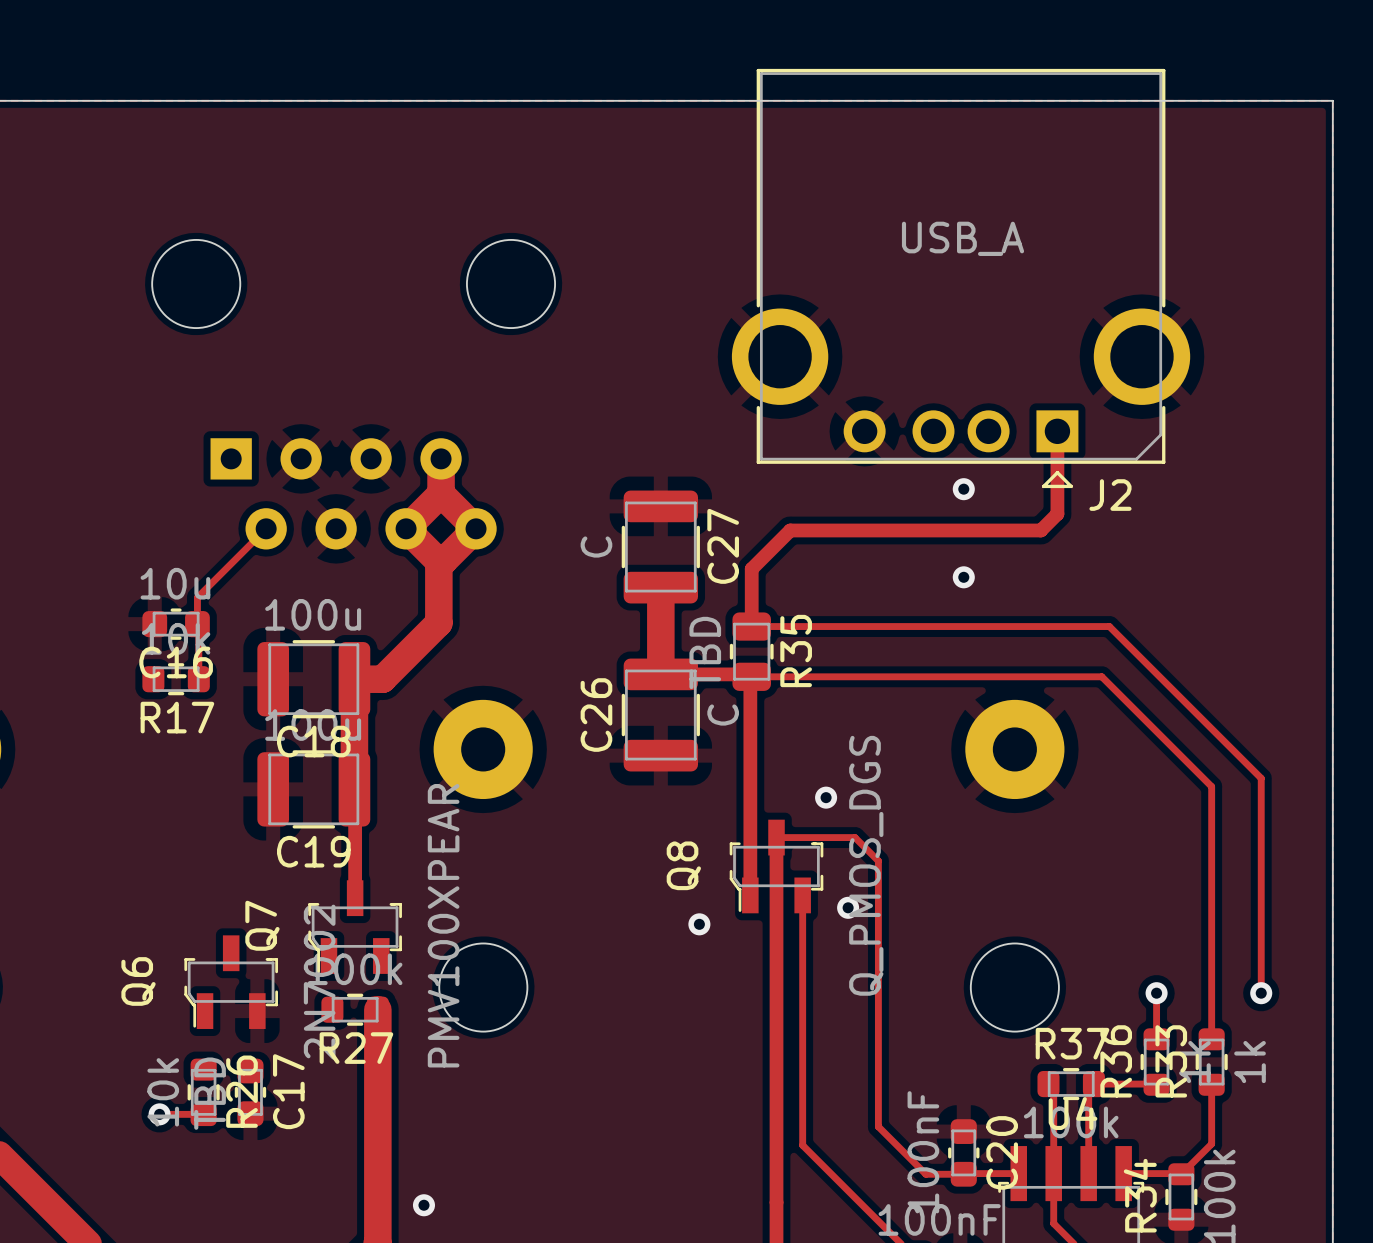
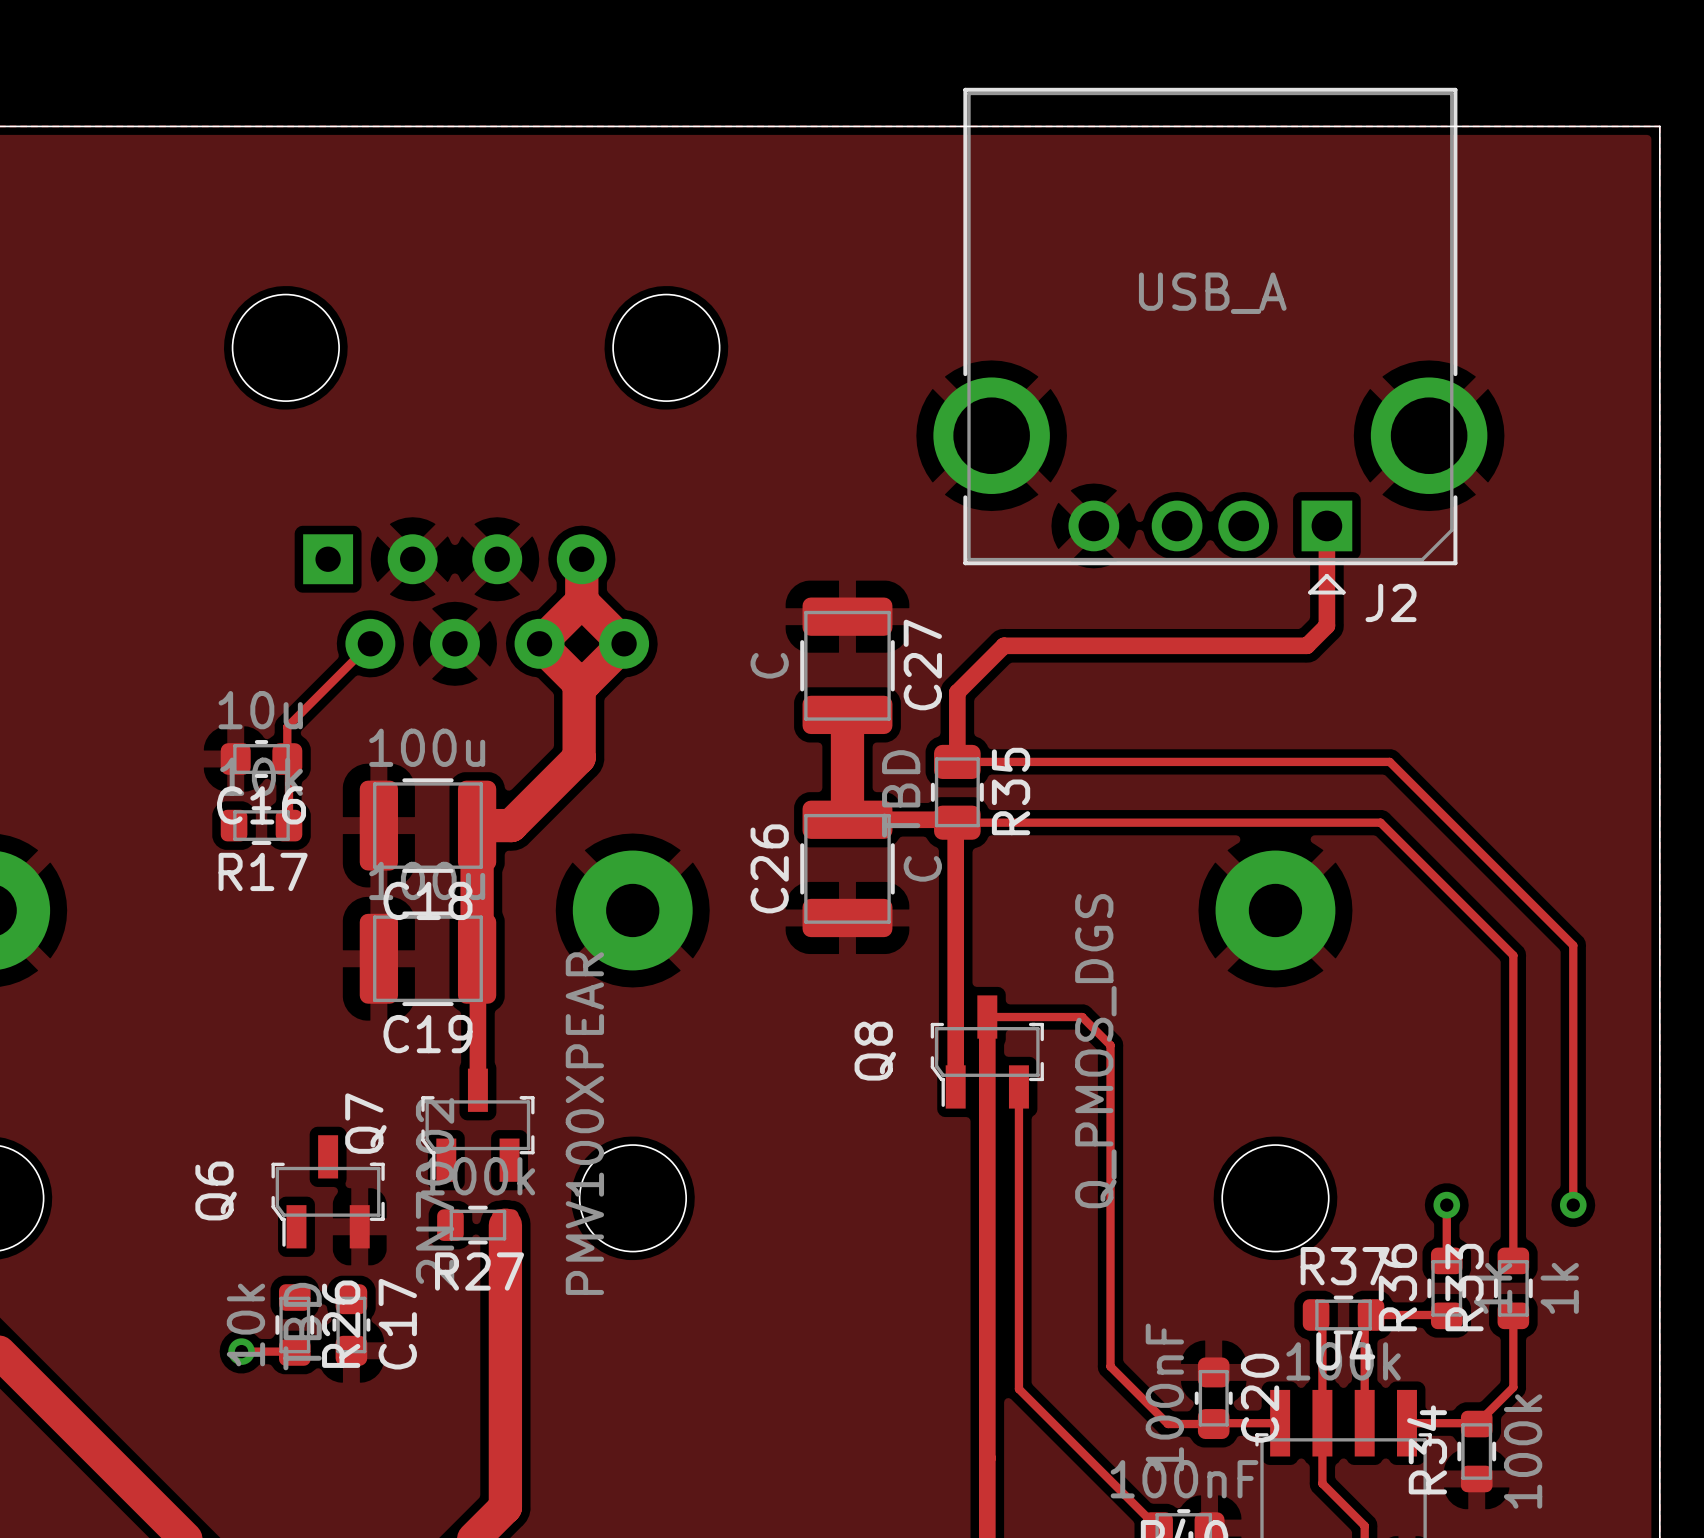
via: (963, 489) -> none
via: (963, 577) -> none
via: (826, 797) -> none
via: (848, 907) -> none
via: (699, 924) -> none
via: (423, 1205) -> none

